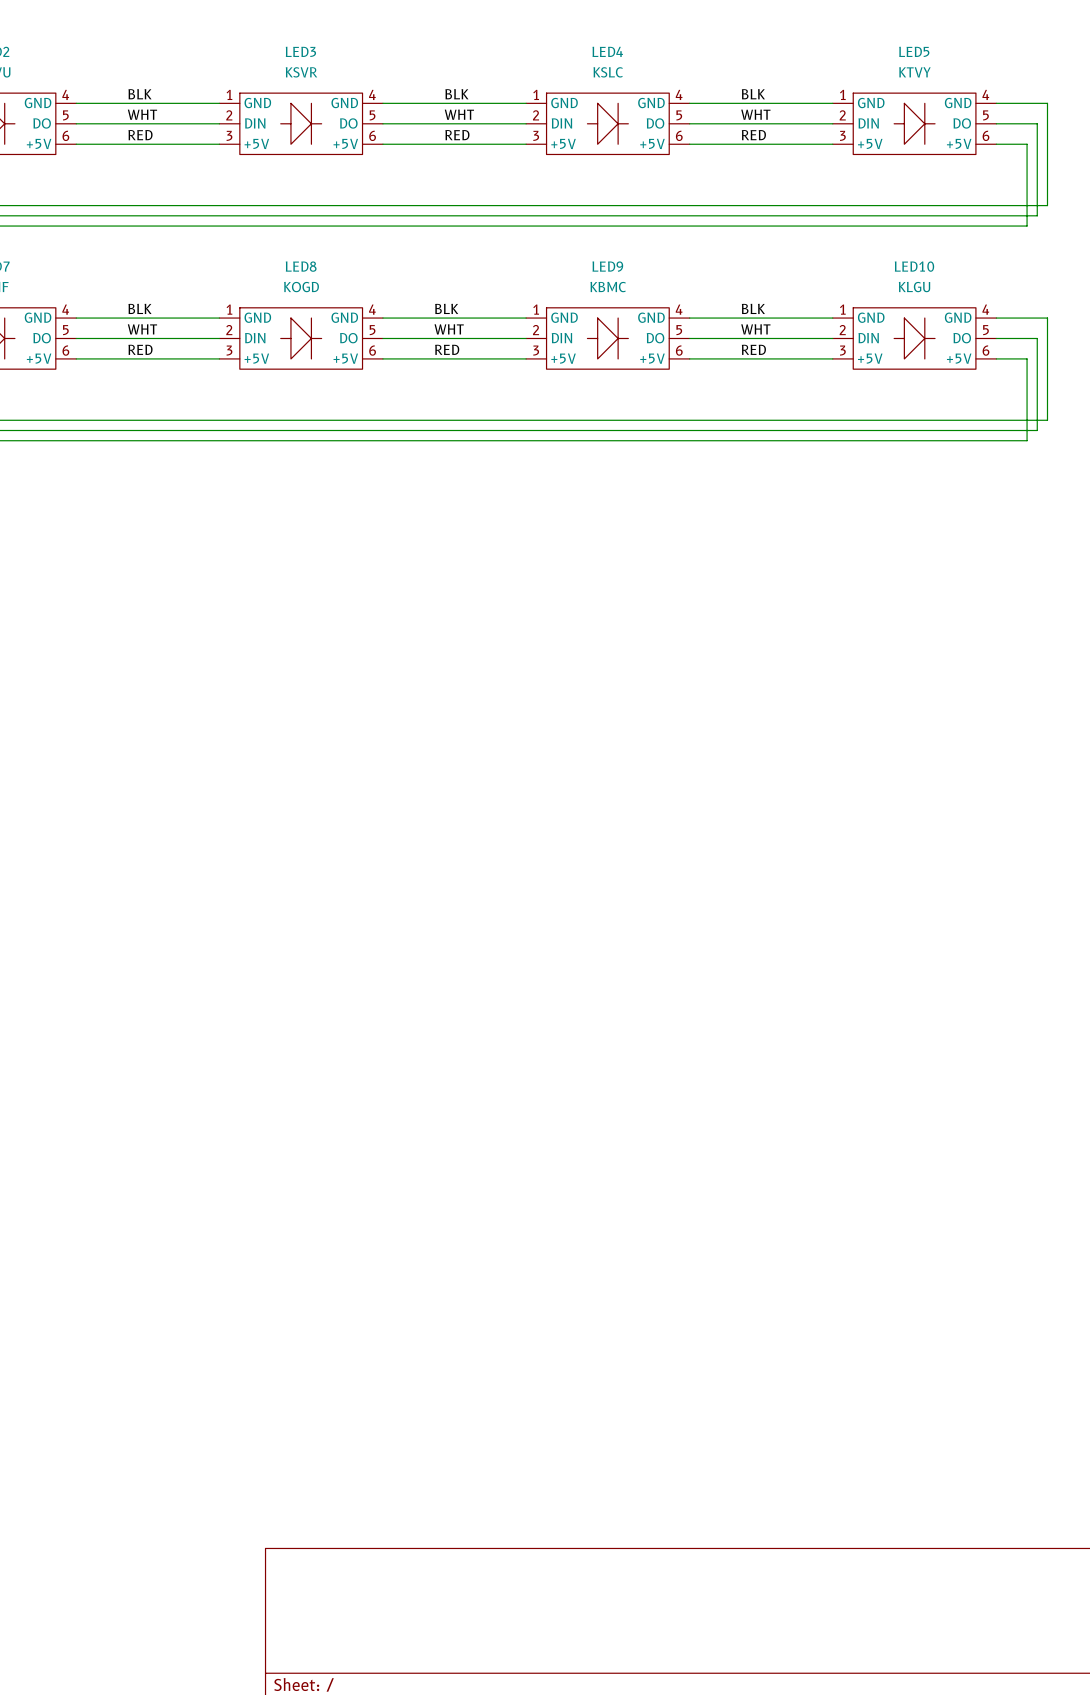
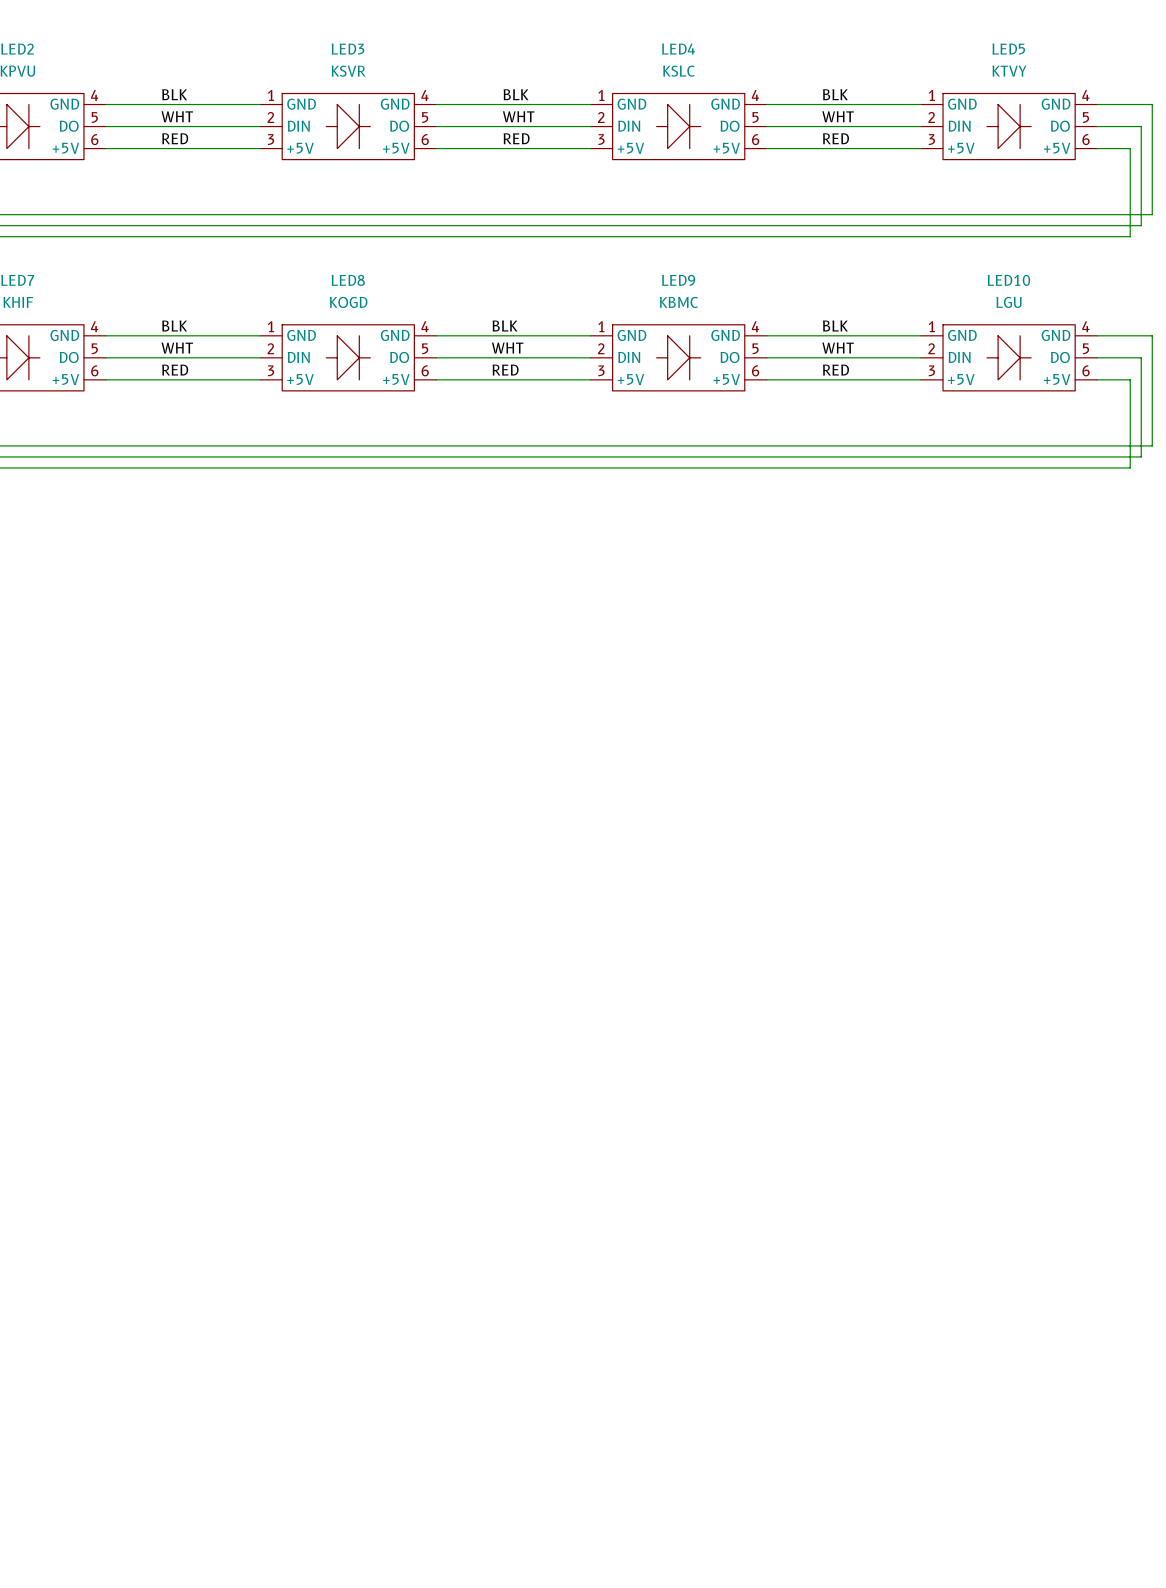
LED10 value: KLGU (914, 287) -> LGU (1009, 302)

